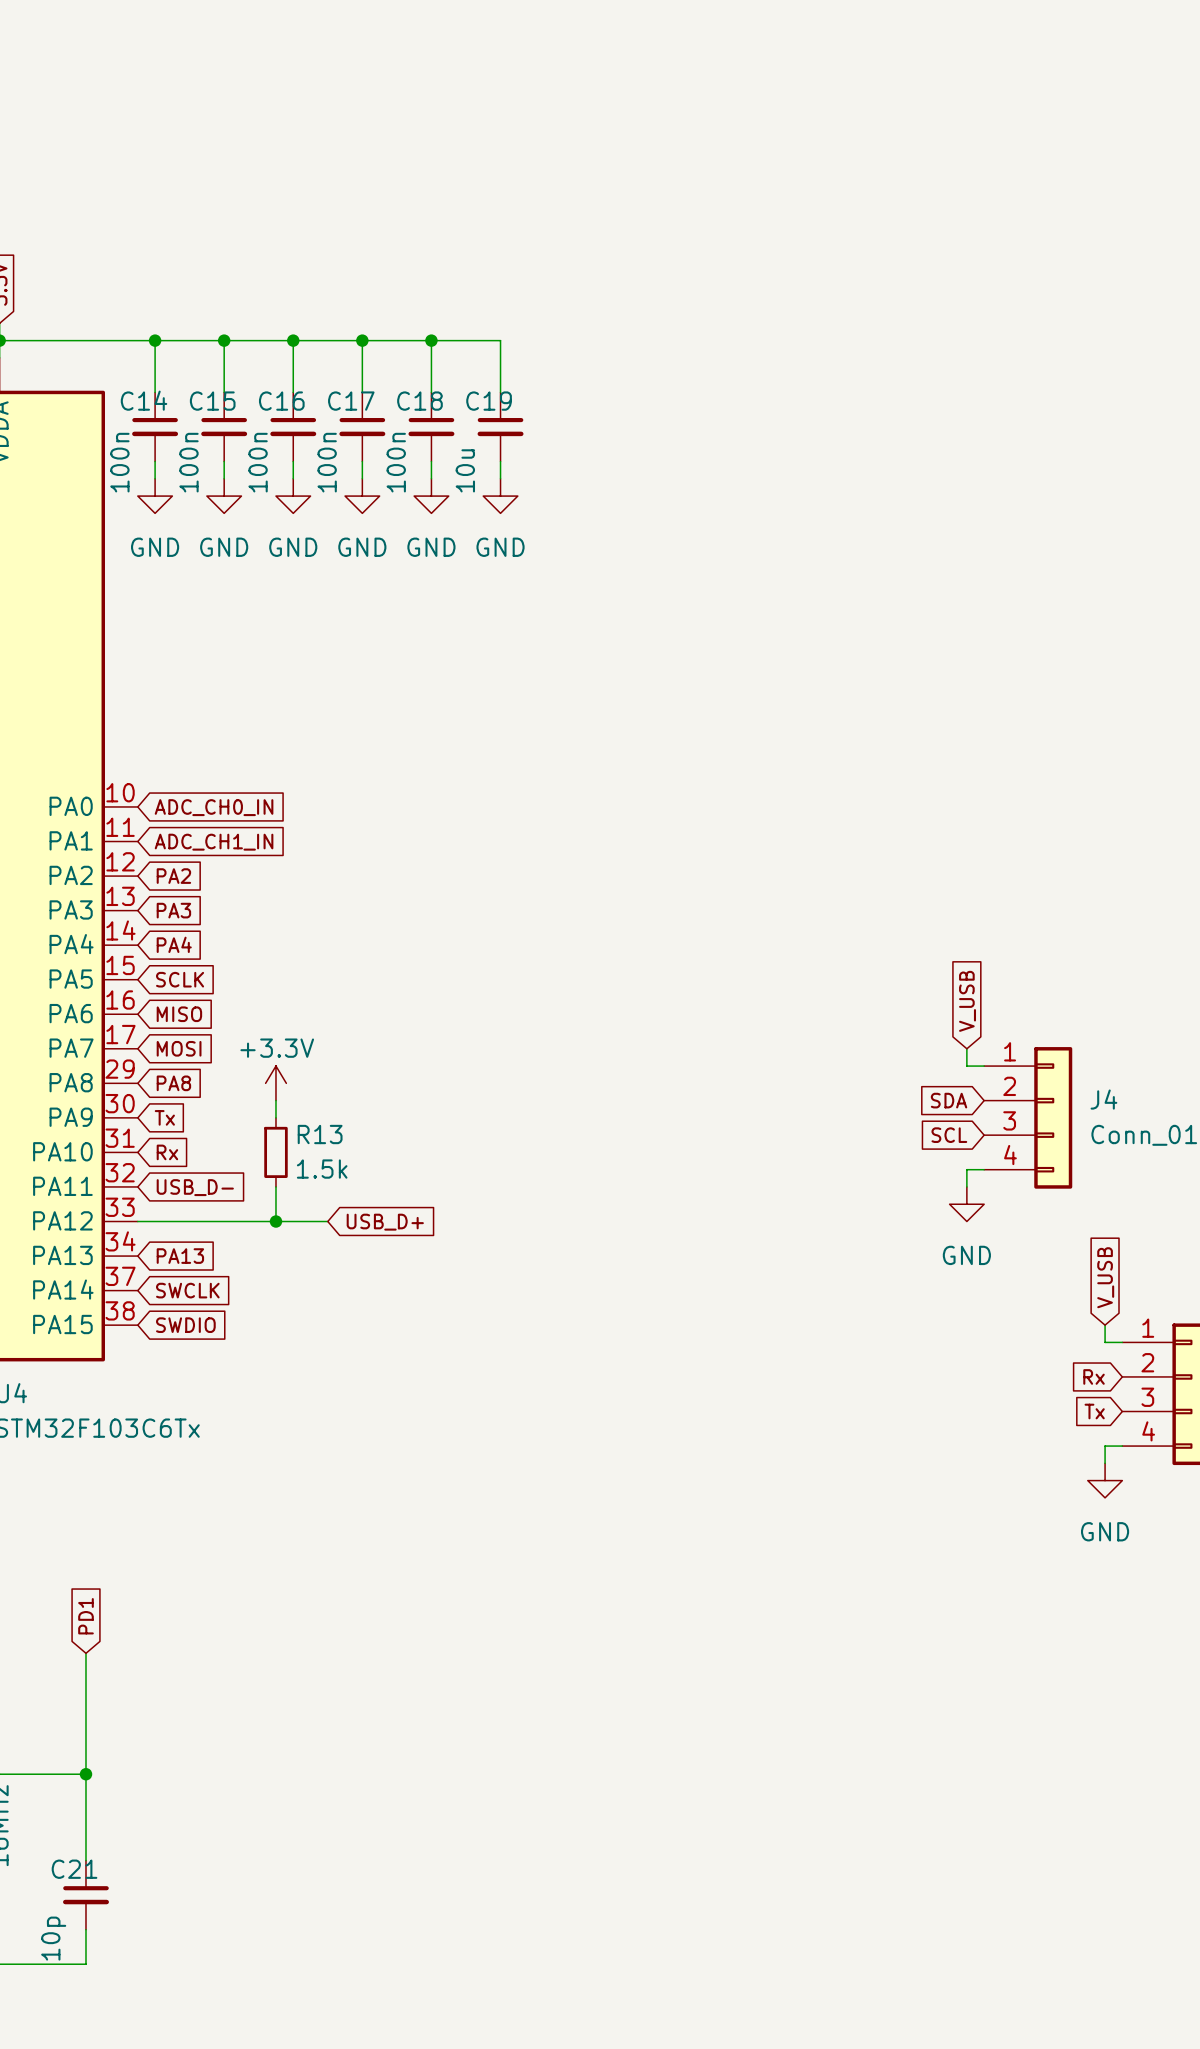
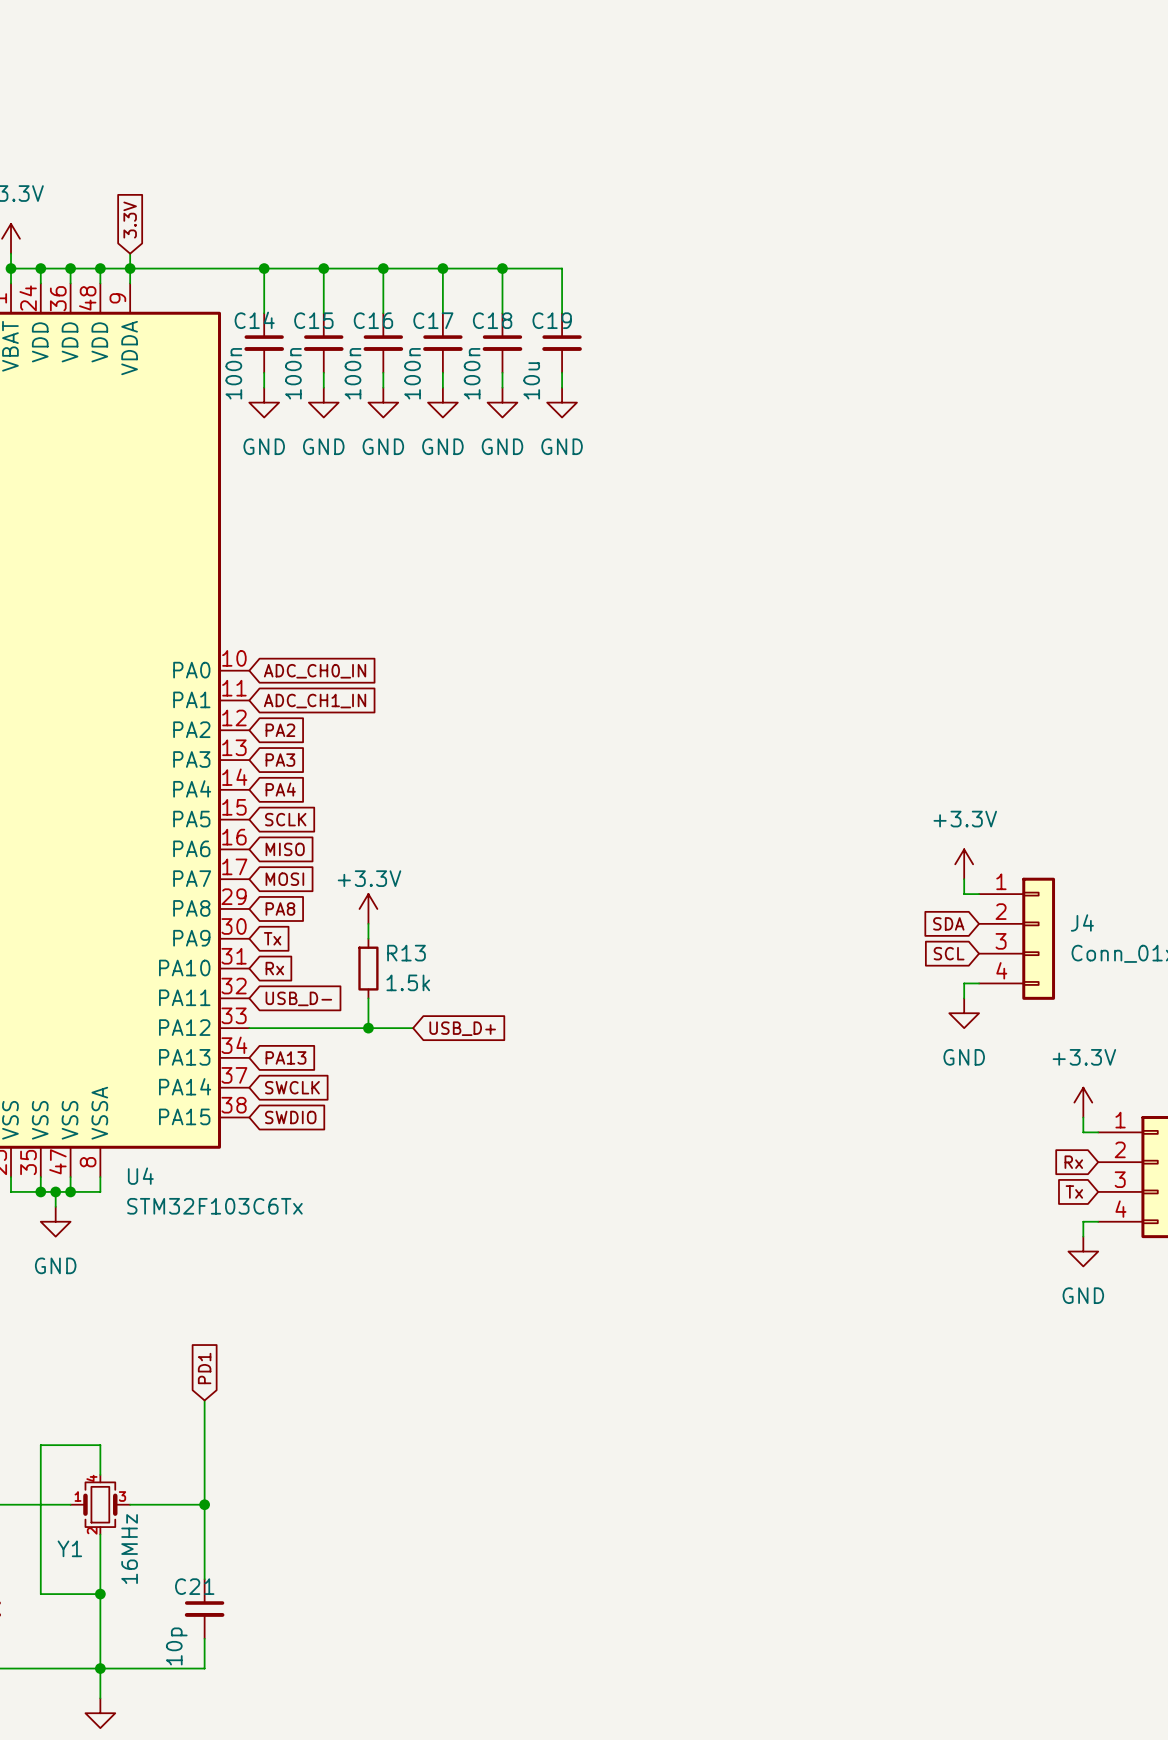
global label: V_USB (967, 1001) -> none
power symbol: none -> +3.3V (964, 864)
global label: V_USB (1105, 1277) -> none
power symbol: none -> +3.3V (1083, 1102)

